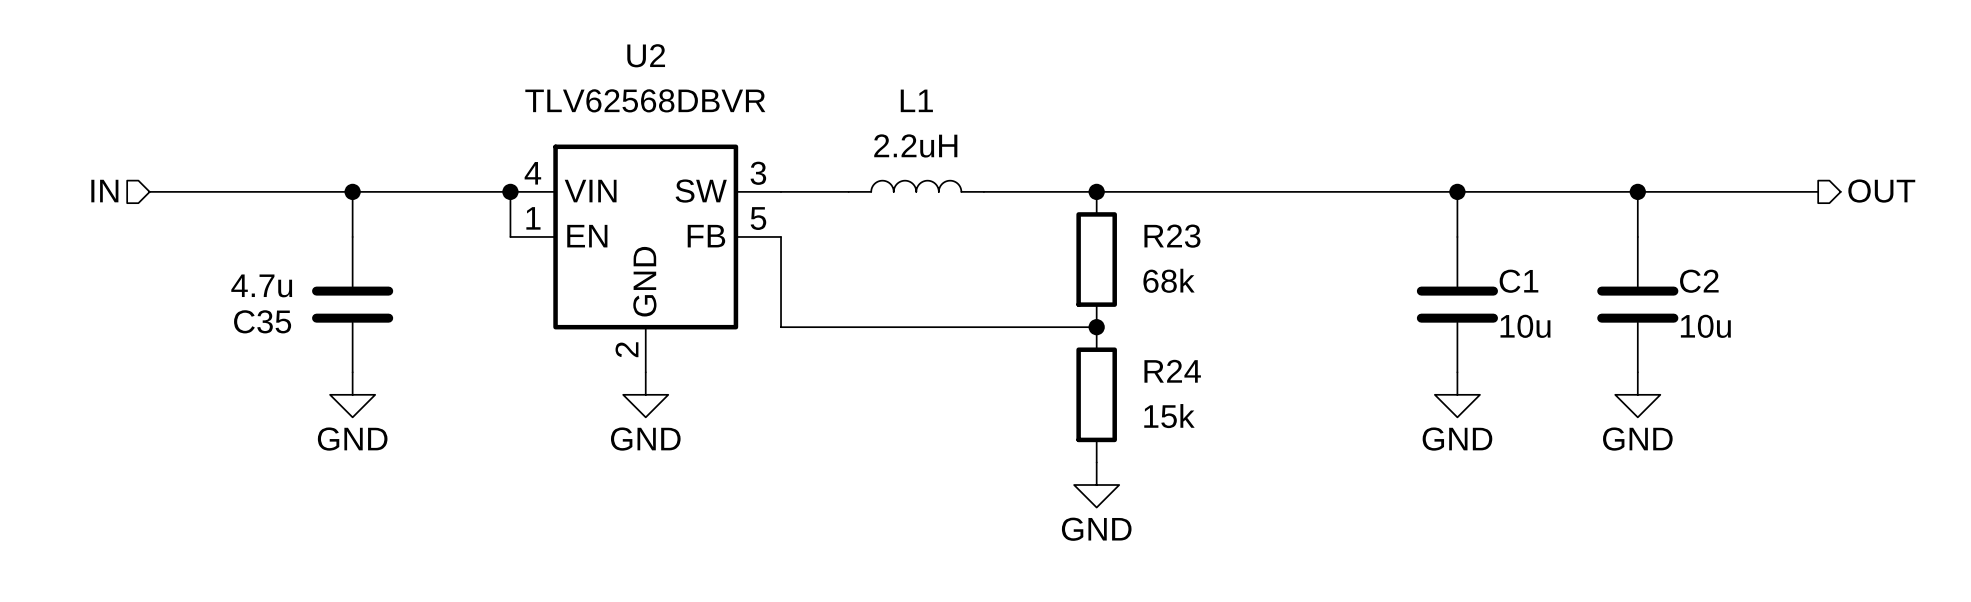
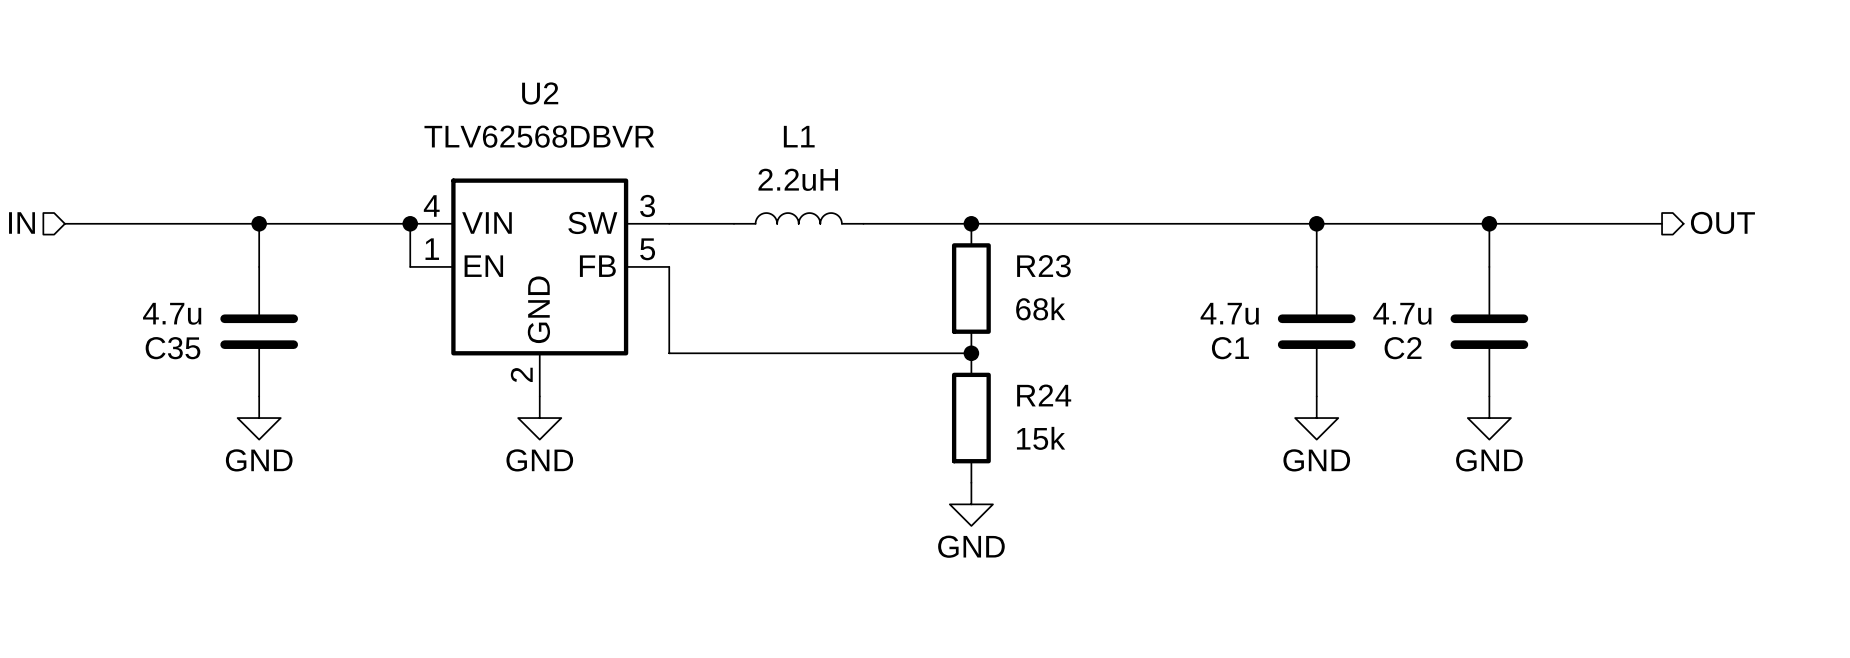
C1 name position: C1 (1518, 281) -> C1 (1230, 348)
C2 name position: C2 (1699, 281) -> C2 (1403, 348)
C1 value: 10u (1525, 326) -> 4.7u (1229, 313)
C2 value: 10u (1705, 326) -> 4.7u (1402, 313)

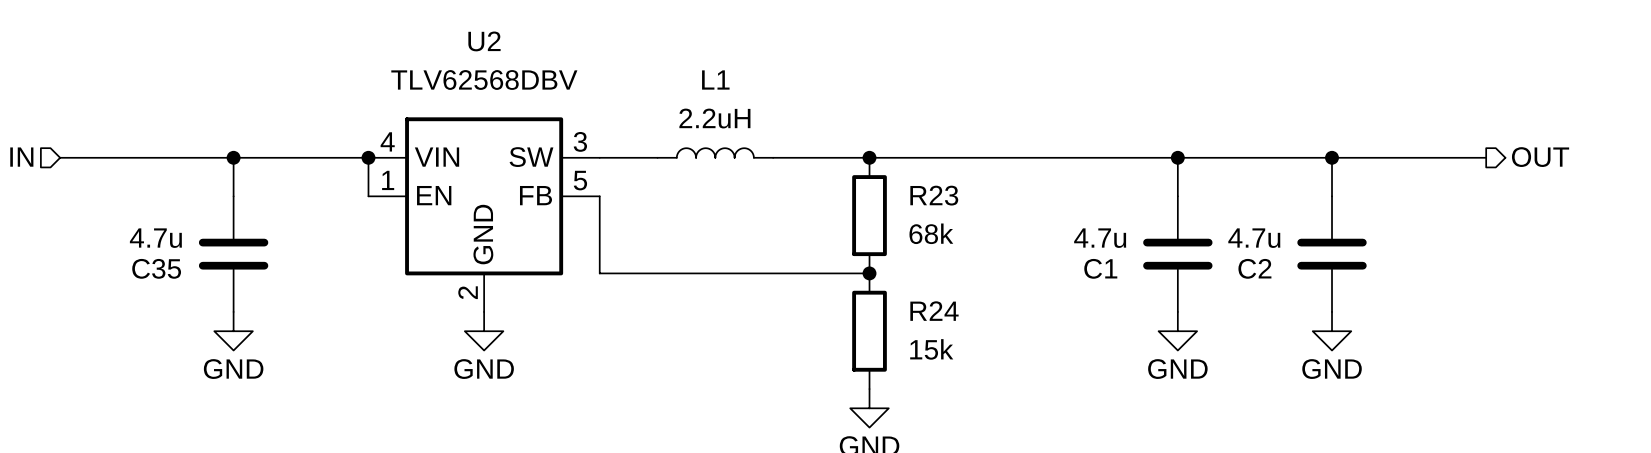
U2 value: TLV62568DBVR (539, 136) -> TLV62568DBV (484, 79)

